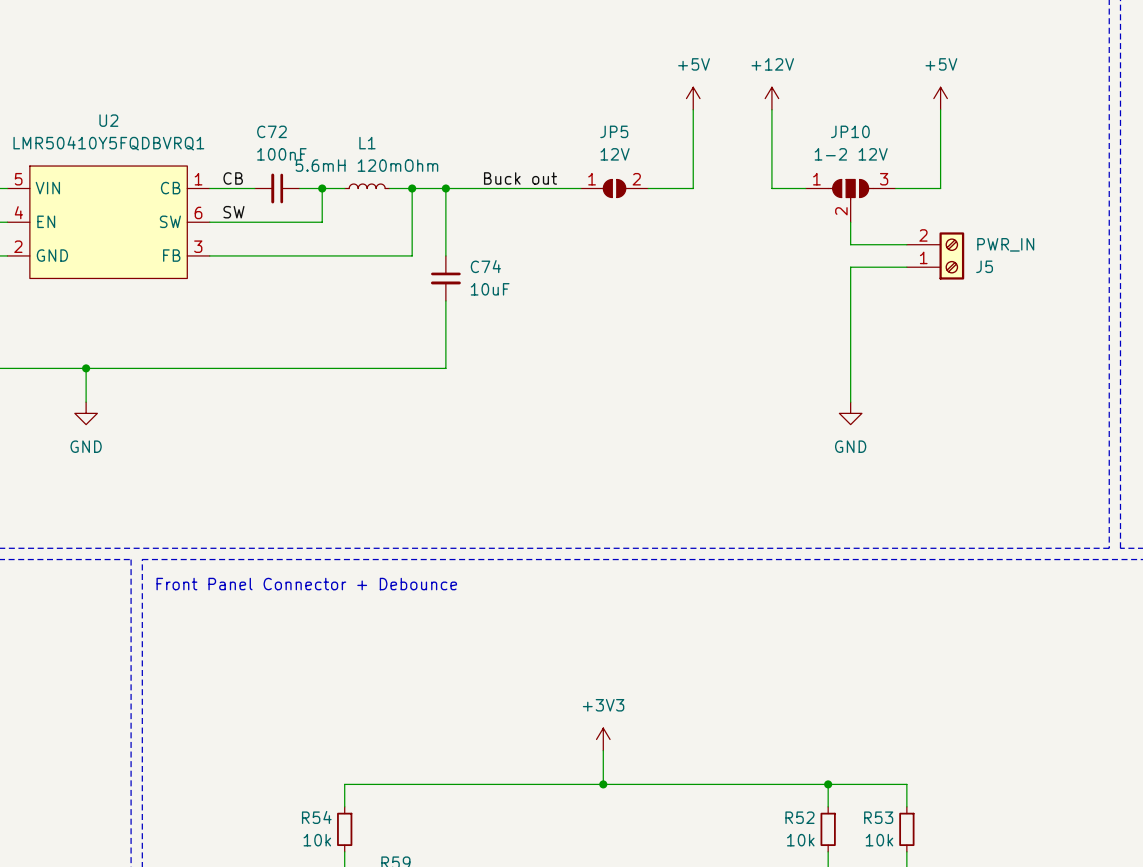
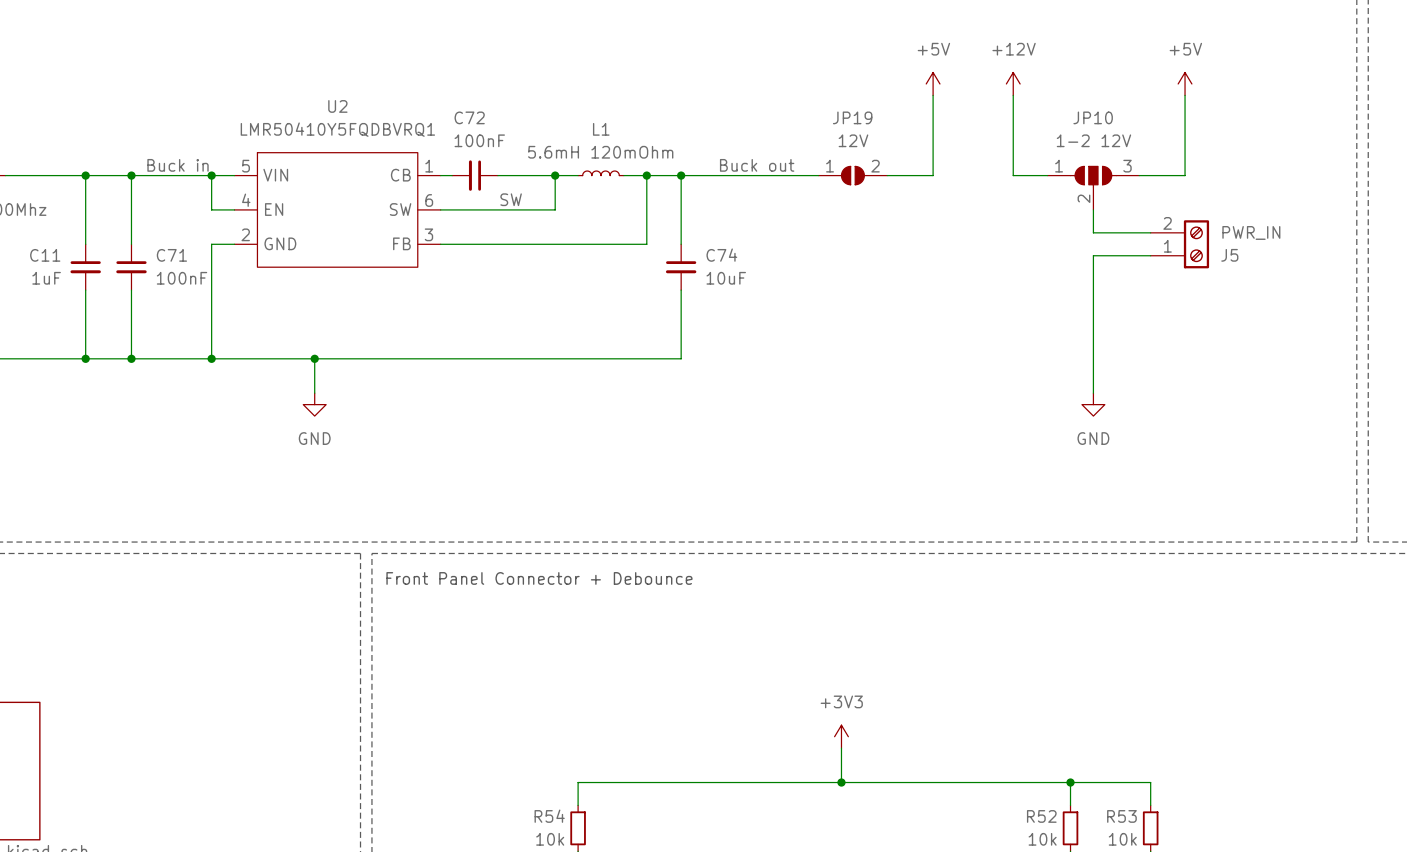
JP5 name: JP5 (614, 131) -> JP19 (852, 117)
label: CB (233, 178) -> none
C72 position: (277, 188) -> (475, 175)
label position: SW (233, 212) -> SW (511, 199)

